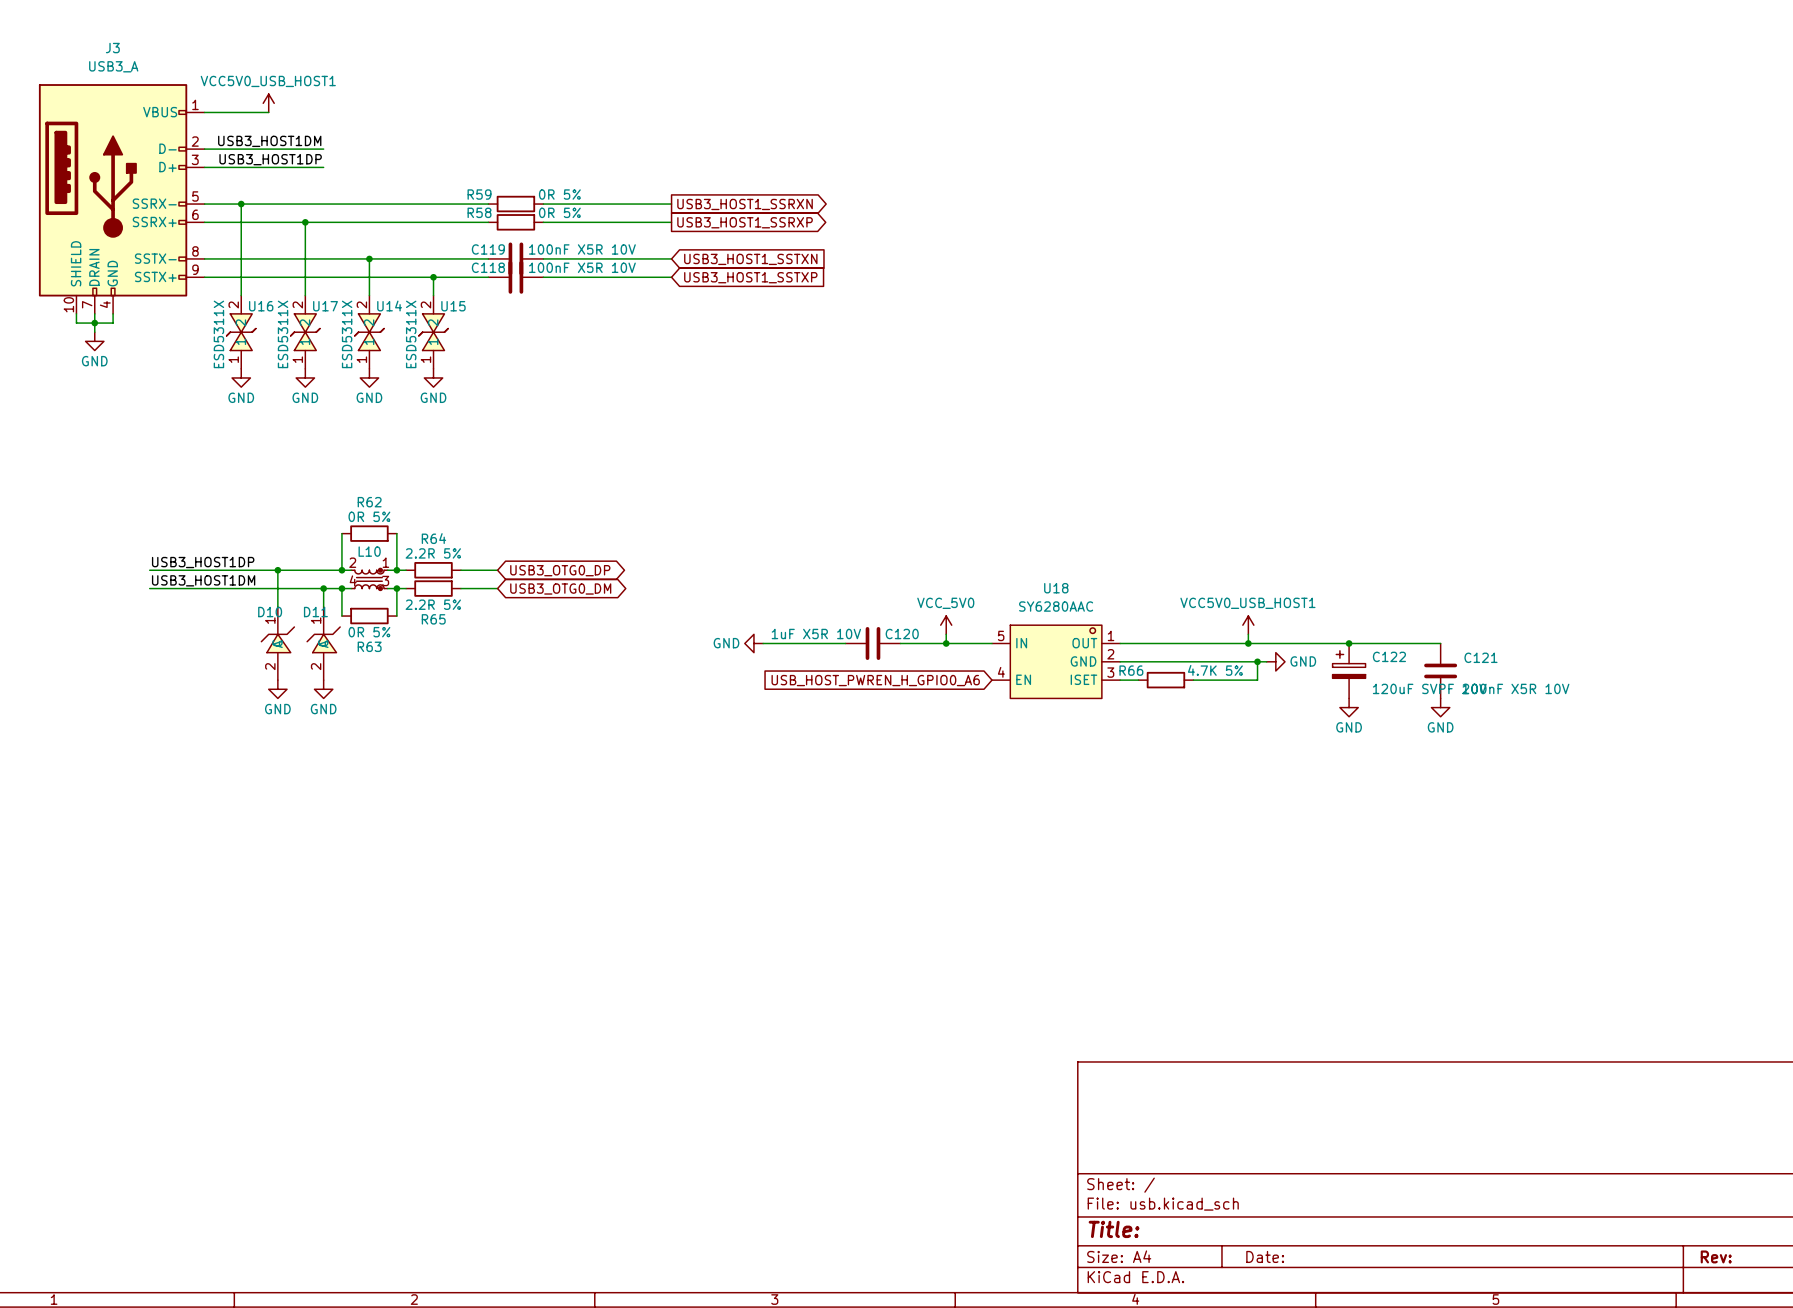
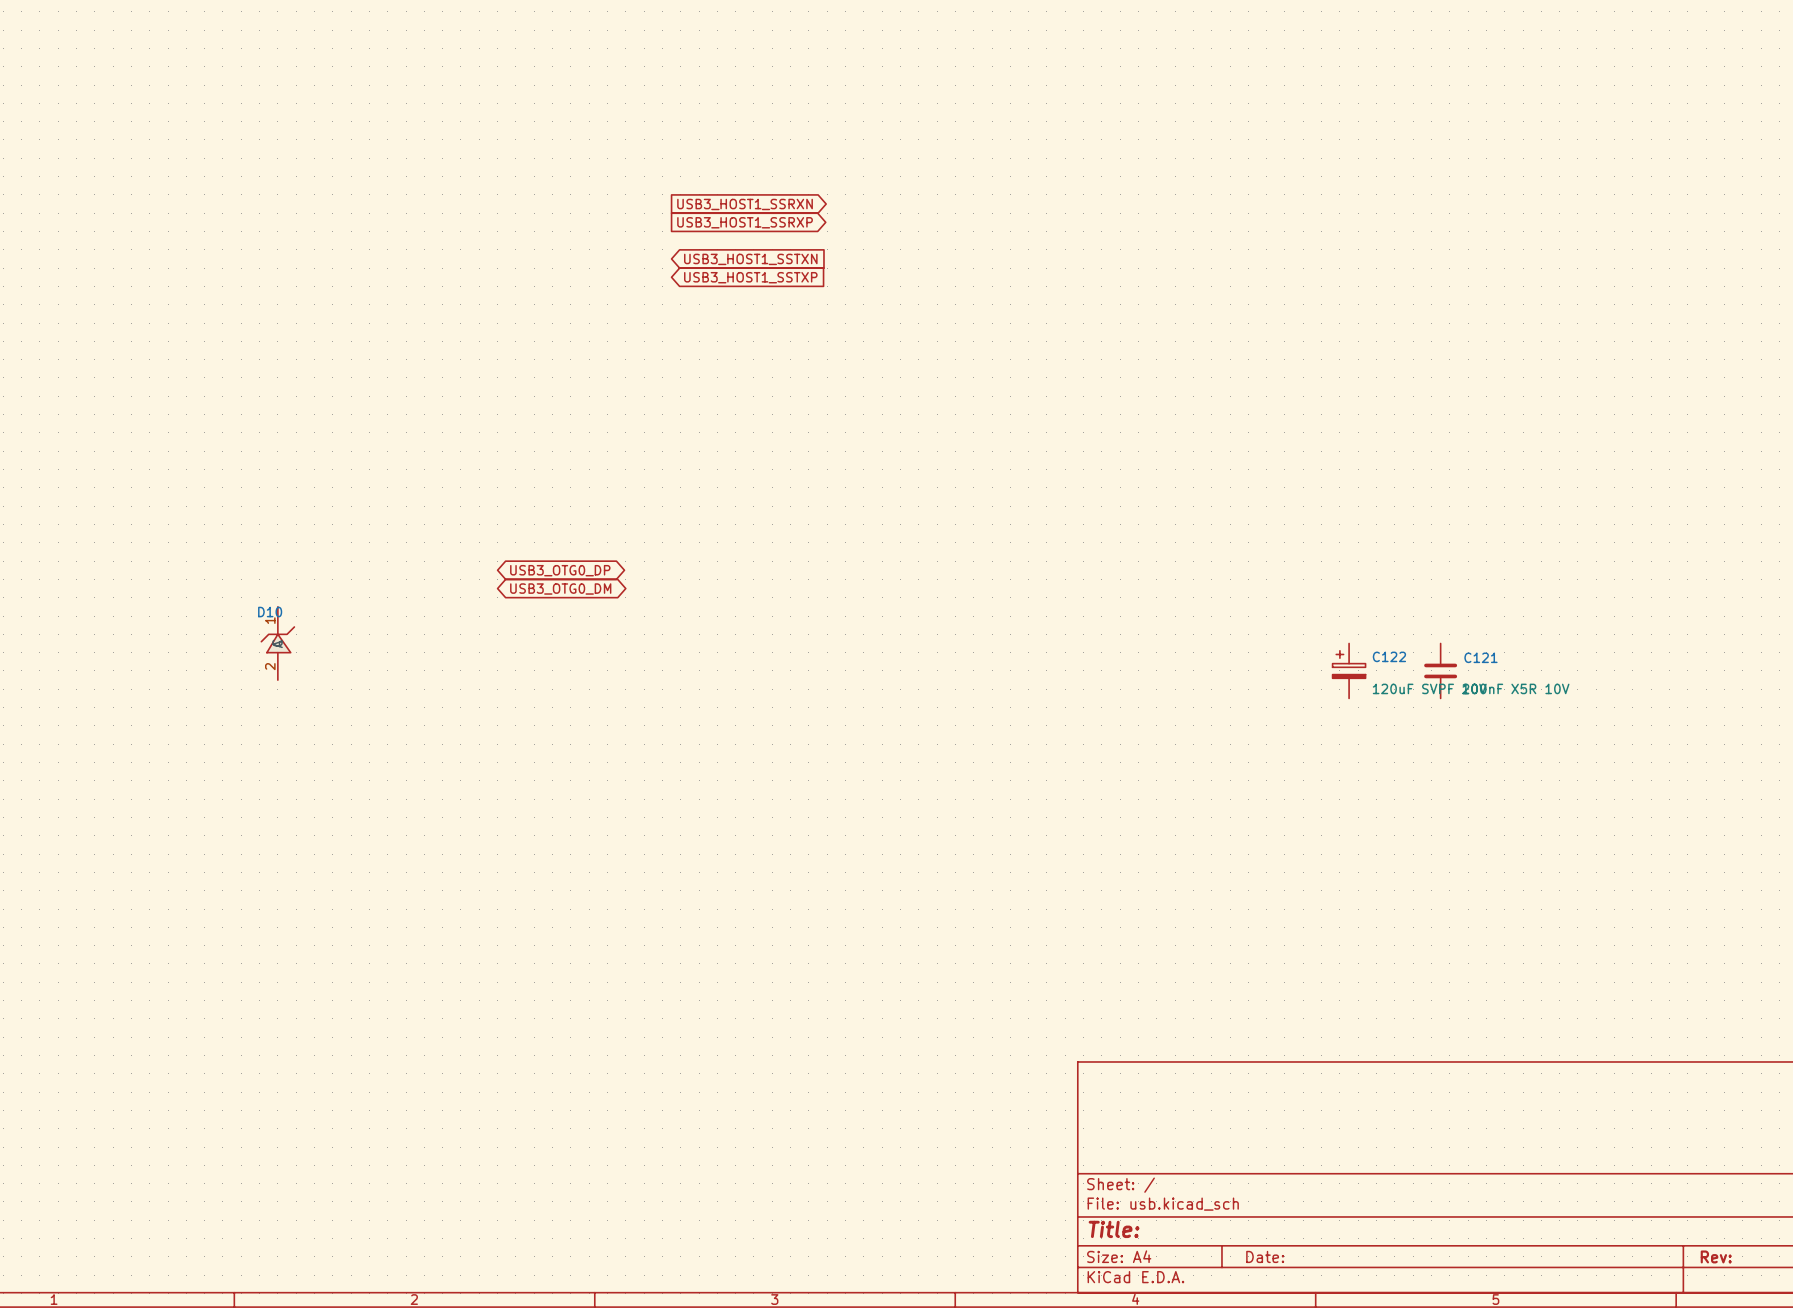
power symbol: VCC5V0_USB_HOST1 (268, 103) -> none
wire: (204, 112) (268, 112) -> none
label: USB3_HOST1DM (269, 141) -> none
wire: (204, 149) (323, 149) -> none
label: USB3_HOST1DP (270, 159) -> none
wire: (204, 167) (323, 167) -> none
J3: USB3_A (121, 198) -> none
wire: (204, 204) (488, 204) -> none
wire: (241, 204) (241, 295) -> none
junction: (241, 204) -> none
R59: 0R 5% (515, 204) -> none
wire: (543, 204) (671, 204) -> none
wire: (204, 222) (488, 222) -> none
wire: (305, 222) (305, 295) -> none
junction: (305, 222) -> none
R58: 0R 5% (515, 222) -> none
wire: (543, 222) (671, 222) -> none
wire: (204, 258) (488, 258) -> none
wire: (369, 258) (369, 295) -> none
junction: (369, 258) -> none
C119: 100nF X5R 10V (515, 258) -> none
wire: (543, 258) (671, 258) -> none
wire: (204, 277) (488, 277) -> none
wire: (433, 277) (433, 295) -> none
junction: (433, 277) -> none
C118: 100nF X5R 10V (515, 277) -> none
wire: (543, 277) (671, 277) -> none
wire: (76, 313) (76, 323) (113, 323) (113, 313) -> none
wire: (94, 313) (94, 332) -> none
junction: (94, 323) -> none
U16: ESD5311X (241, 332) -> none
U17: ESD5311X (305, 332) -> none
U14: ESD5311X (369, 332) -> none
U15: ESD5311X (433, 332) -> none
power symbol: GND (94, 341) -> none
power symbol: GND (241, 377) -> none
power symbol: GND (305, 377) -> none
power symbol: GND (369, 377) -> none
power symbol: GND (433, 377) -> none
wire: (341, 533) (341, 570) -> none
R62: 0R 5% (369, 533) -> none
wire: (396, 533) (396, 570) -> none
label: USB3_HOST1DP (203, 562) -> none
wire: (149, 570) (351, 570) -> none
wire: (277, 570) (277, 606) -> none
junction: (277, 570) -> none
junction: (341, 570) -> none
wire: (387, 570) (406, 570) -> none
junction: (396, 570) -> none
R64: 2.2R 5% (433, 570) -> none
wire: (460, 570) (497, 570) -> none
L10: (369, 579) -> none
label: USB3_HOST1DM (203, 580) -> none
wire: (149, 588) (351, 588) -> none
wire: (323, 588) (323, 606) -> none
junction: (323, 588) -> none
wire: (341, 588) (341, 616) -> none
junction: (341, 588) -> none
wire: (387, 588) (406, 588) -> none
wire: (396, 588) (396, 616) -> none
junction: (396, 588) -> none
R65: 2.2R 5% (433, 588) -> none
wire: (460, 588) (497, 588) -> none
R63: 0R 5% (369, 616) -> none
power symbol: VCC_5V0 (946, 625) -> none
power symbol: VCC5V0_USB_HOST1 (1248, 625) -> none
wire: (946, 634) (946, 643) -> none
wire: (1248, 634) (1248, 643) -> none
D11: (323, 643) -> none
power symbol: GND (753, 643) -> none
wire: (763, 643) (845, 643) -> none
C120: 1uF X5R 10V (872, 643) -> none
wire: (900, 643) (992, 643) -> none
junction: (946, 643) -> none
wire: (1120, 643) (1440, 643) -> none
junction: (1248, 643) -> none
junction: (1349, 643) -> none
U18: SY6280AAC (1056, 661) -> none
wire: (1120, 661) (1266, 661) -> none
wire: (1257, 661) (1257, 680) (1193, 680) -> none
junction: (1257, 661) -> none
power symbol: GND (1275, 661) -> none
global label: USB_HOST_PWREN_H_GPIO0_A6 (875, 680) -> none
wire: (1120, 680) (1138, 680) -> none
R66: 4.7K 5% (1165, 680) -> none
power symbol: GND (277, 689) -> none
power symbol: GND (323, 689) -> none
power symbol: GND (1349, 707) -> none
power symbol: GND (1440, 707) -> none

